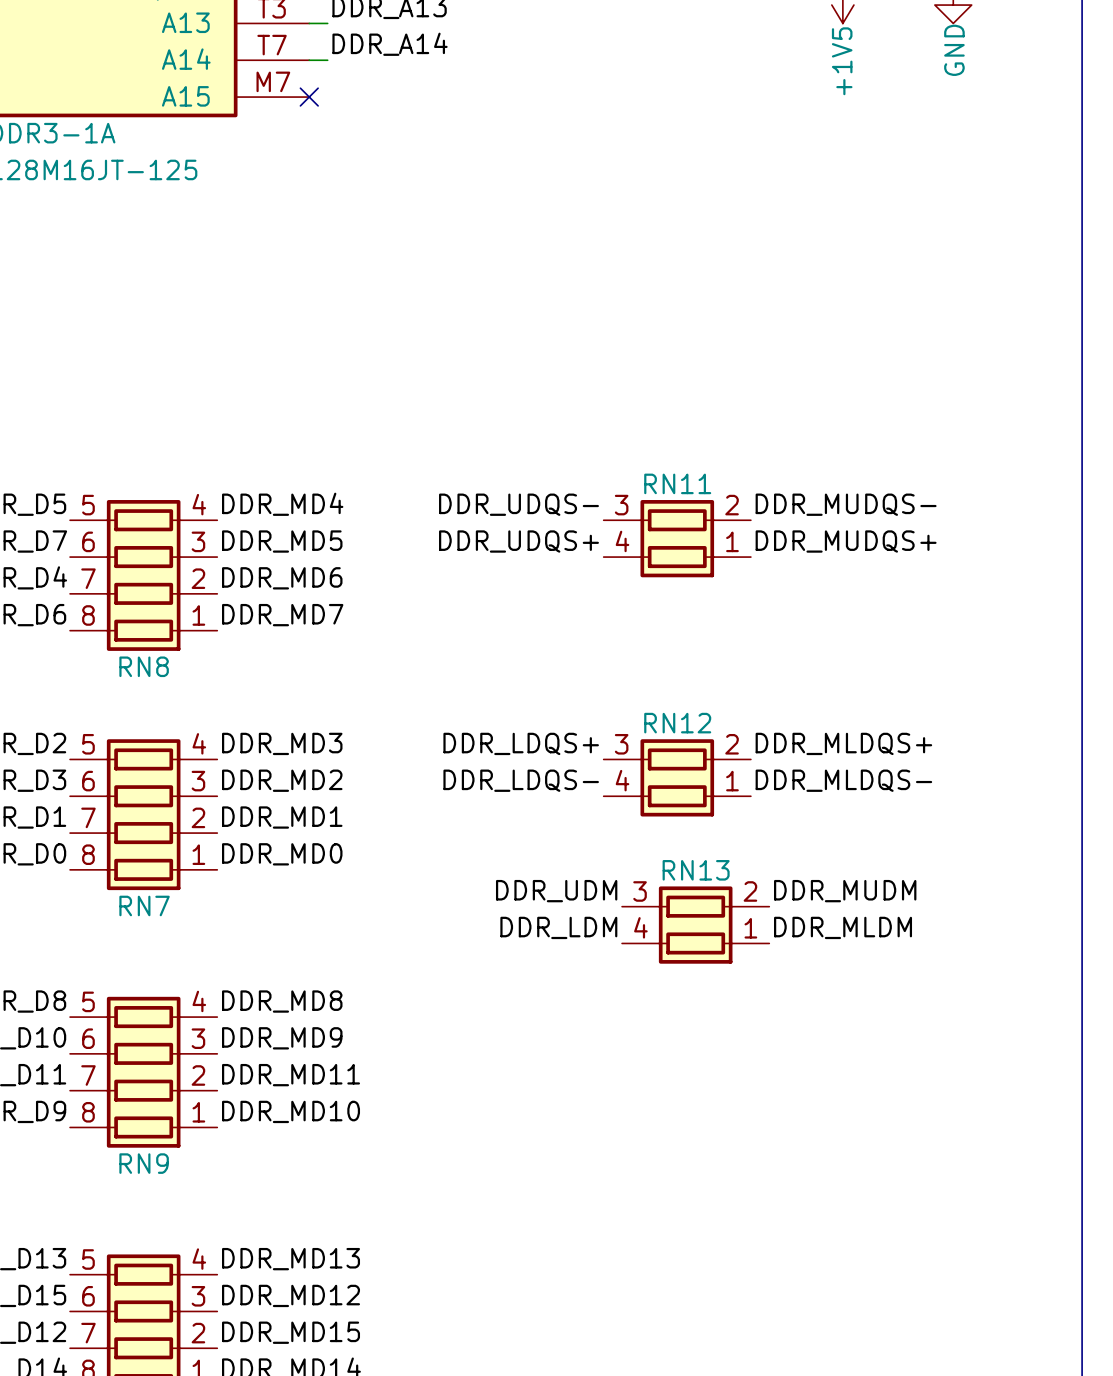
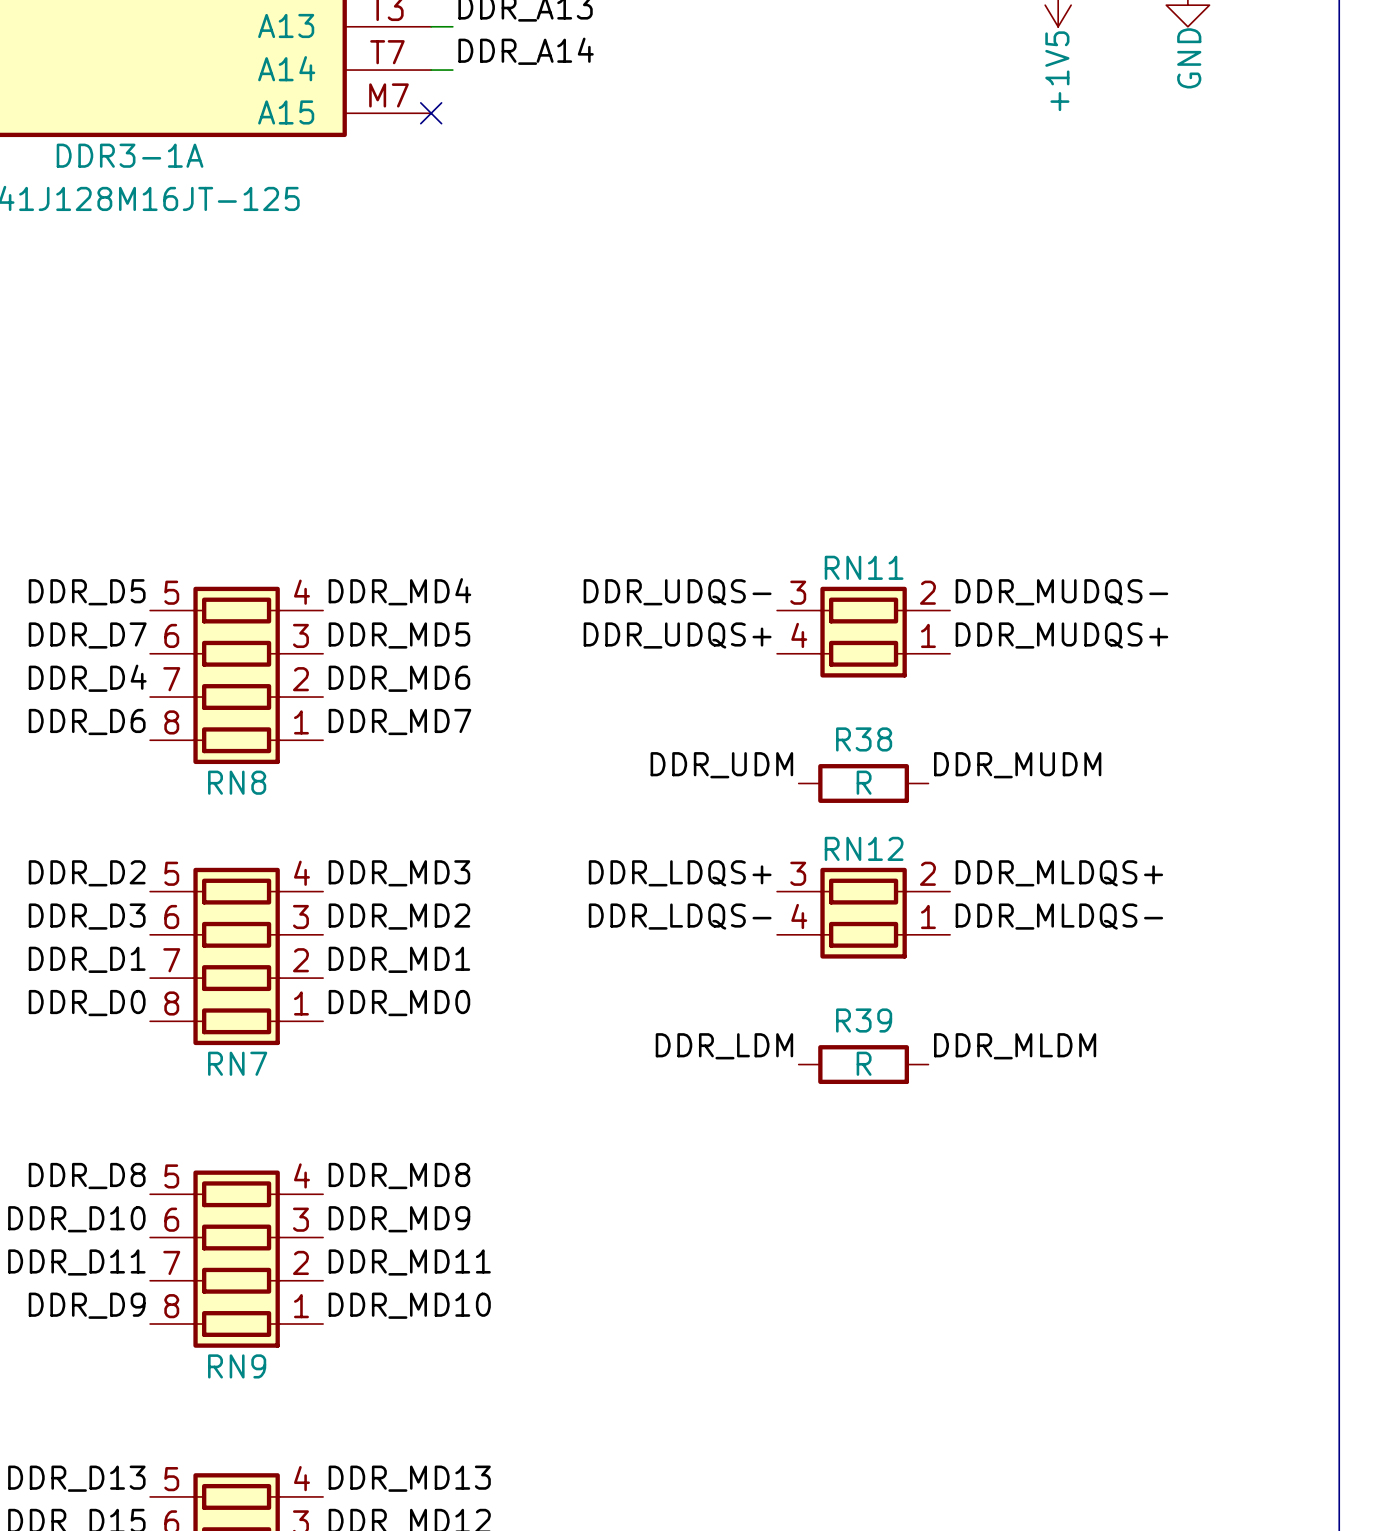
label: none -> DDR_UDM (721, 765)
R38: none -> R (863, 783)
label: DDR_UDM (556, 891) -> DDR_LDM (724, 1046)
label position: DDR_MUDM (845, 891) -> DDR_MUDM (1017, 765)
R39: none -> R (863, 1064)
RN13: (695, 925) -> none
label: DDR_LDM (558, 927) -> none
label position: DDR_MLDM (843, 927) -> DDR_MLDM (1015, 1046)

